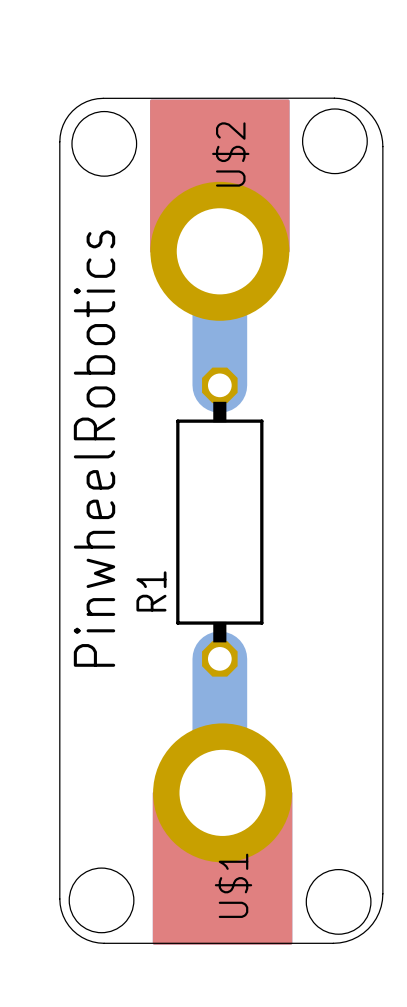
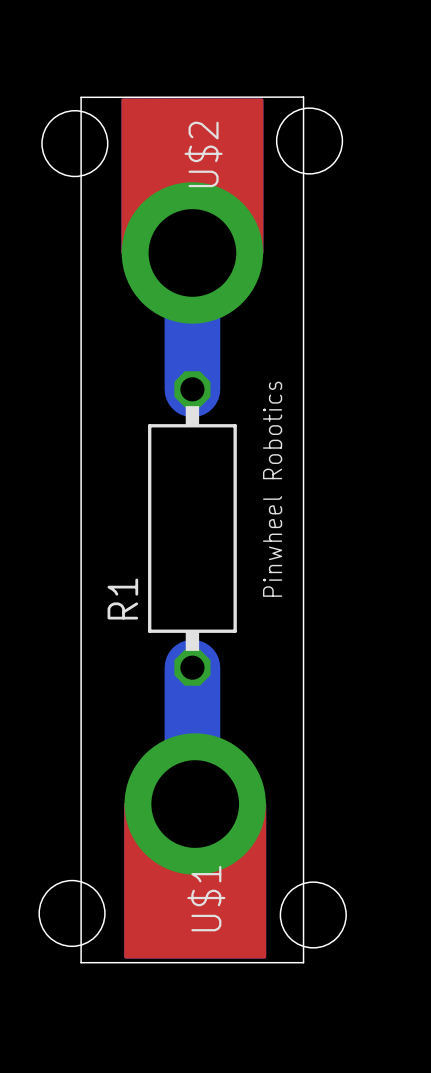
board edge: (329, 98) (350, 100) (368, 112) (380, 130) (382, 146) (382, 893) (379, 912) (368, 928) (352, 939) (333, 943) (98, 942) (87, 939) (77, 934) (68, 925) (61, 910) (59, 141) (63, 125) (76, 107) (91, 99) (110, 98) -> (303, 97) (303, 962) (81, 962) (81, 97)
text: PinwheelRobotics (94, 448) -> none
text: none -> Pinwheel Robotics (272, 489)

